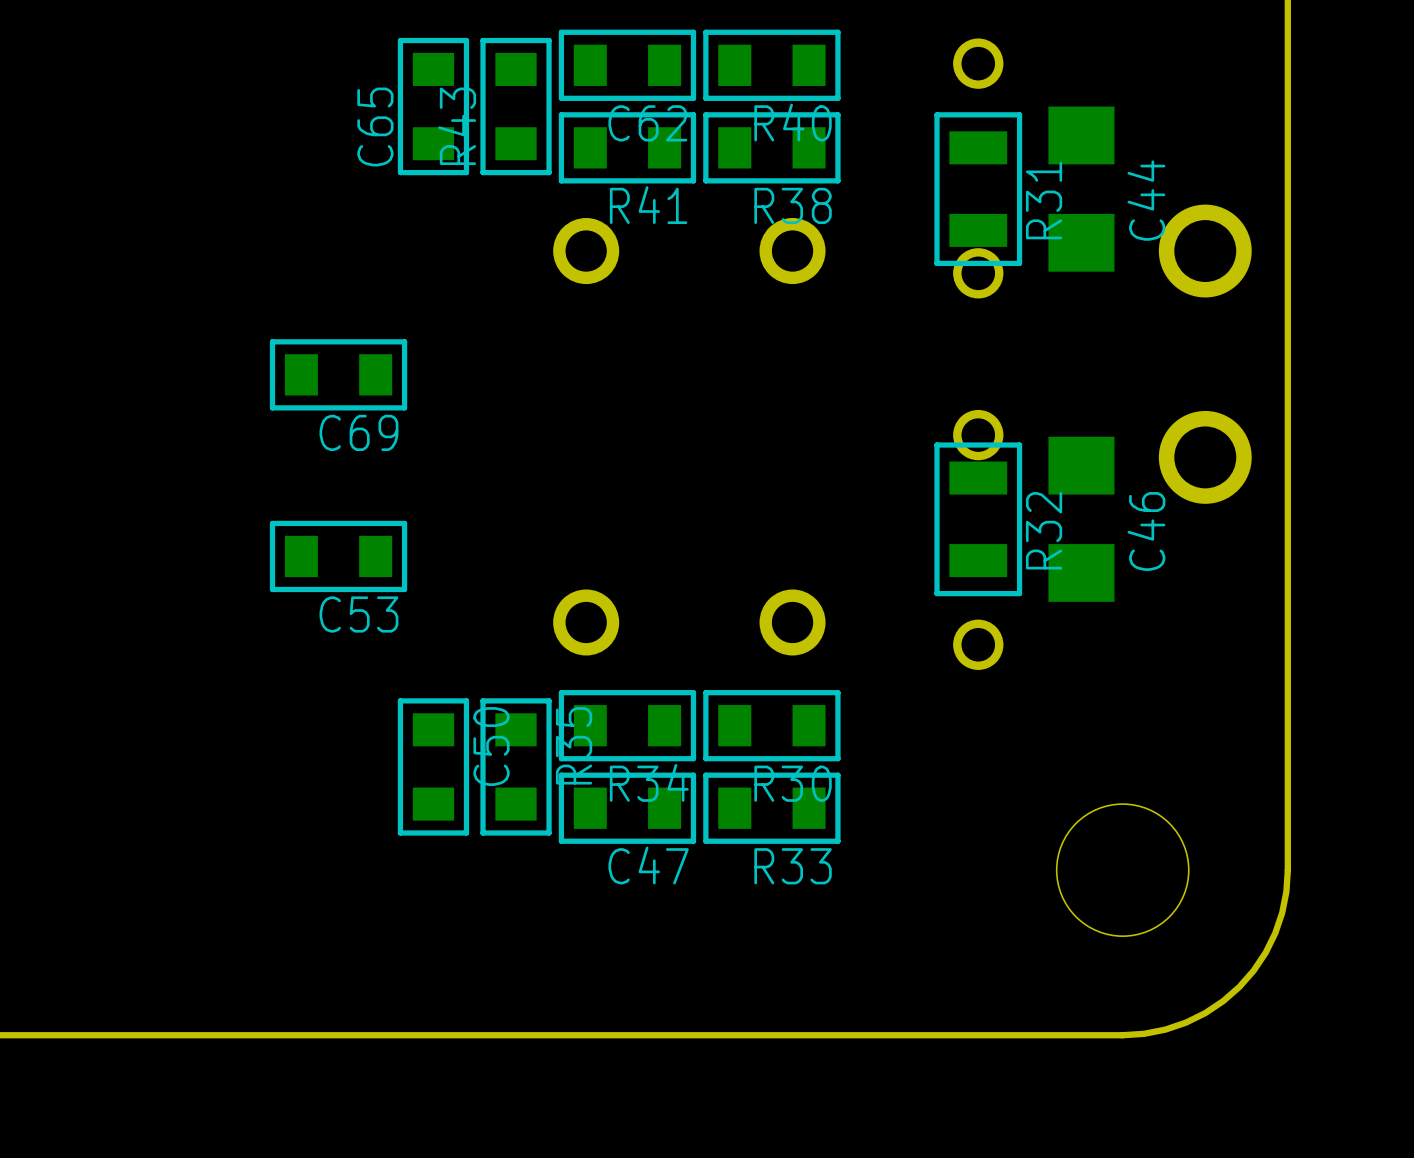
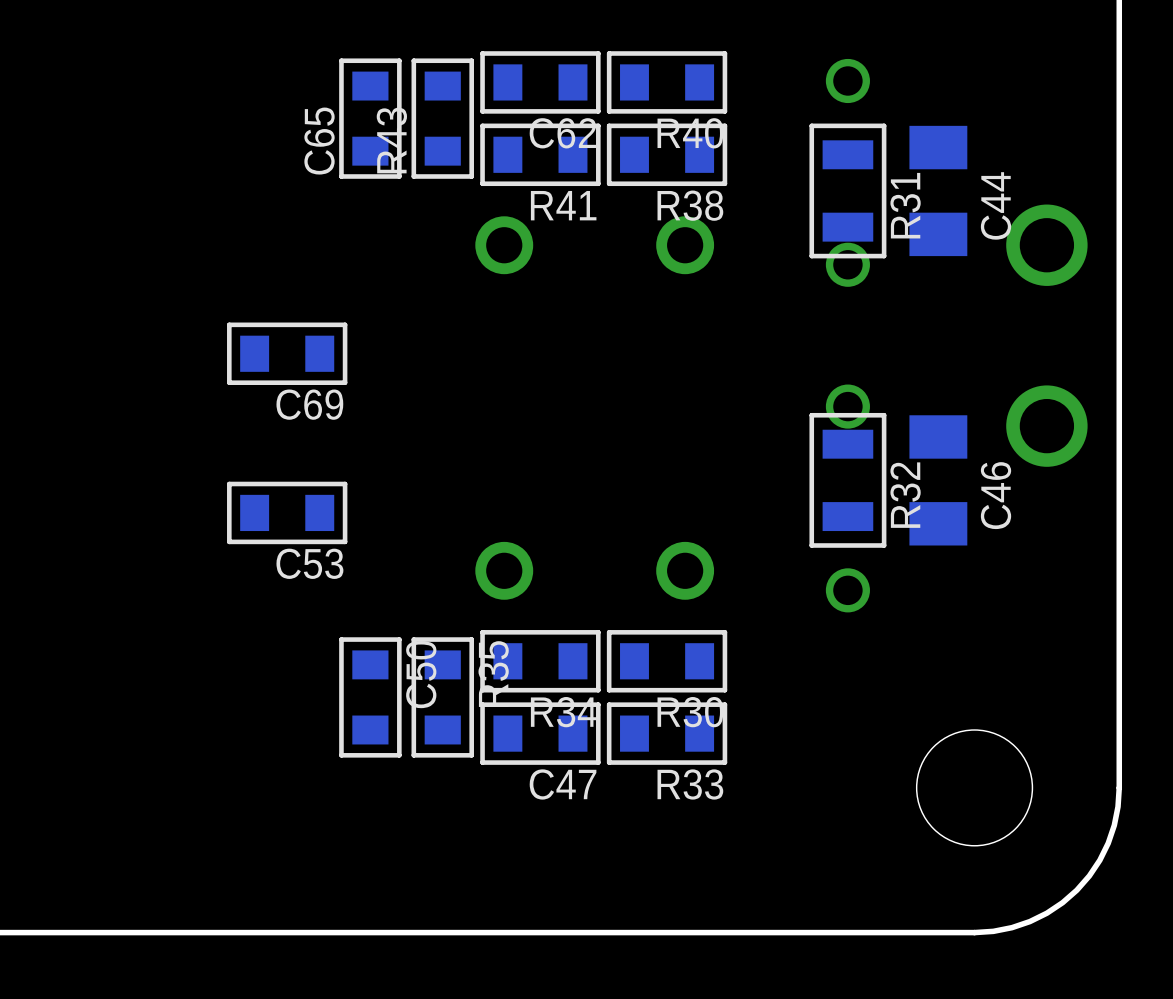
C44 footprint: [1048, 106, 1115, 272] -> [909, 125, 968, 257]
C46 footprint: [1048, 436, 1115, 602] -> [909, 415, 968, 546]

